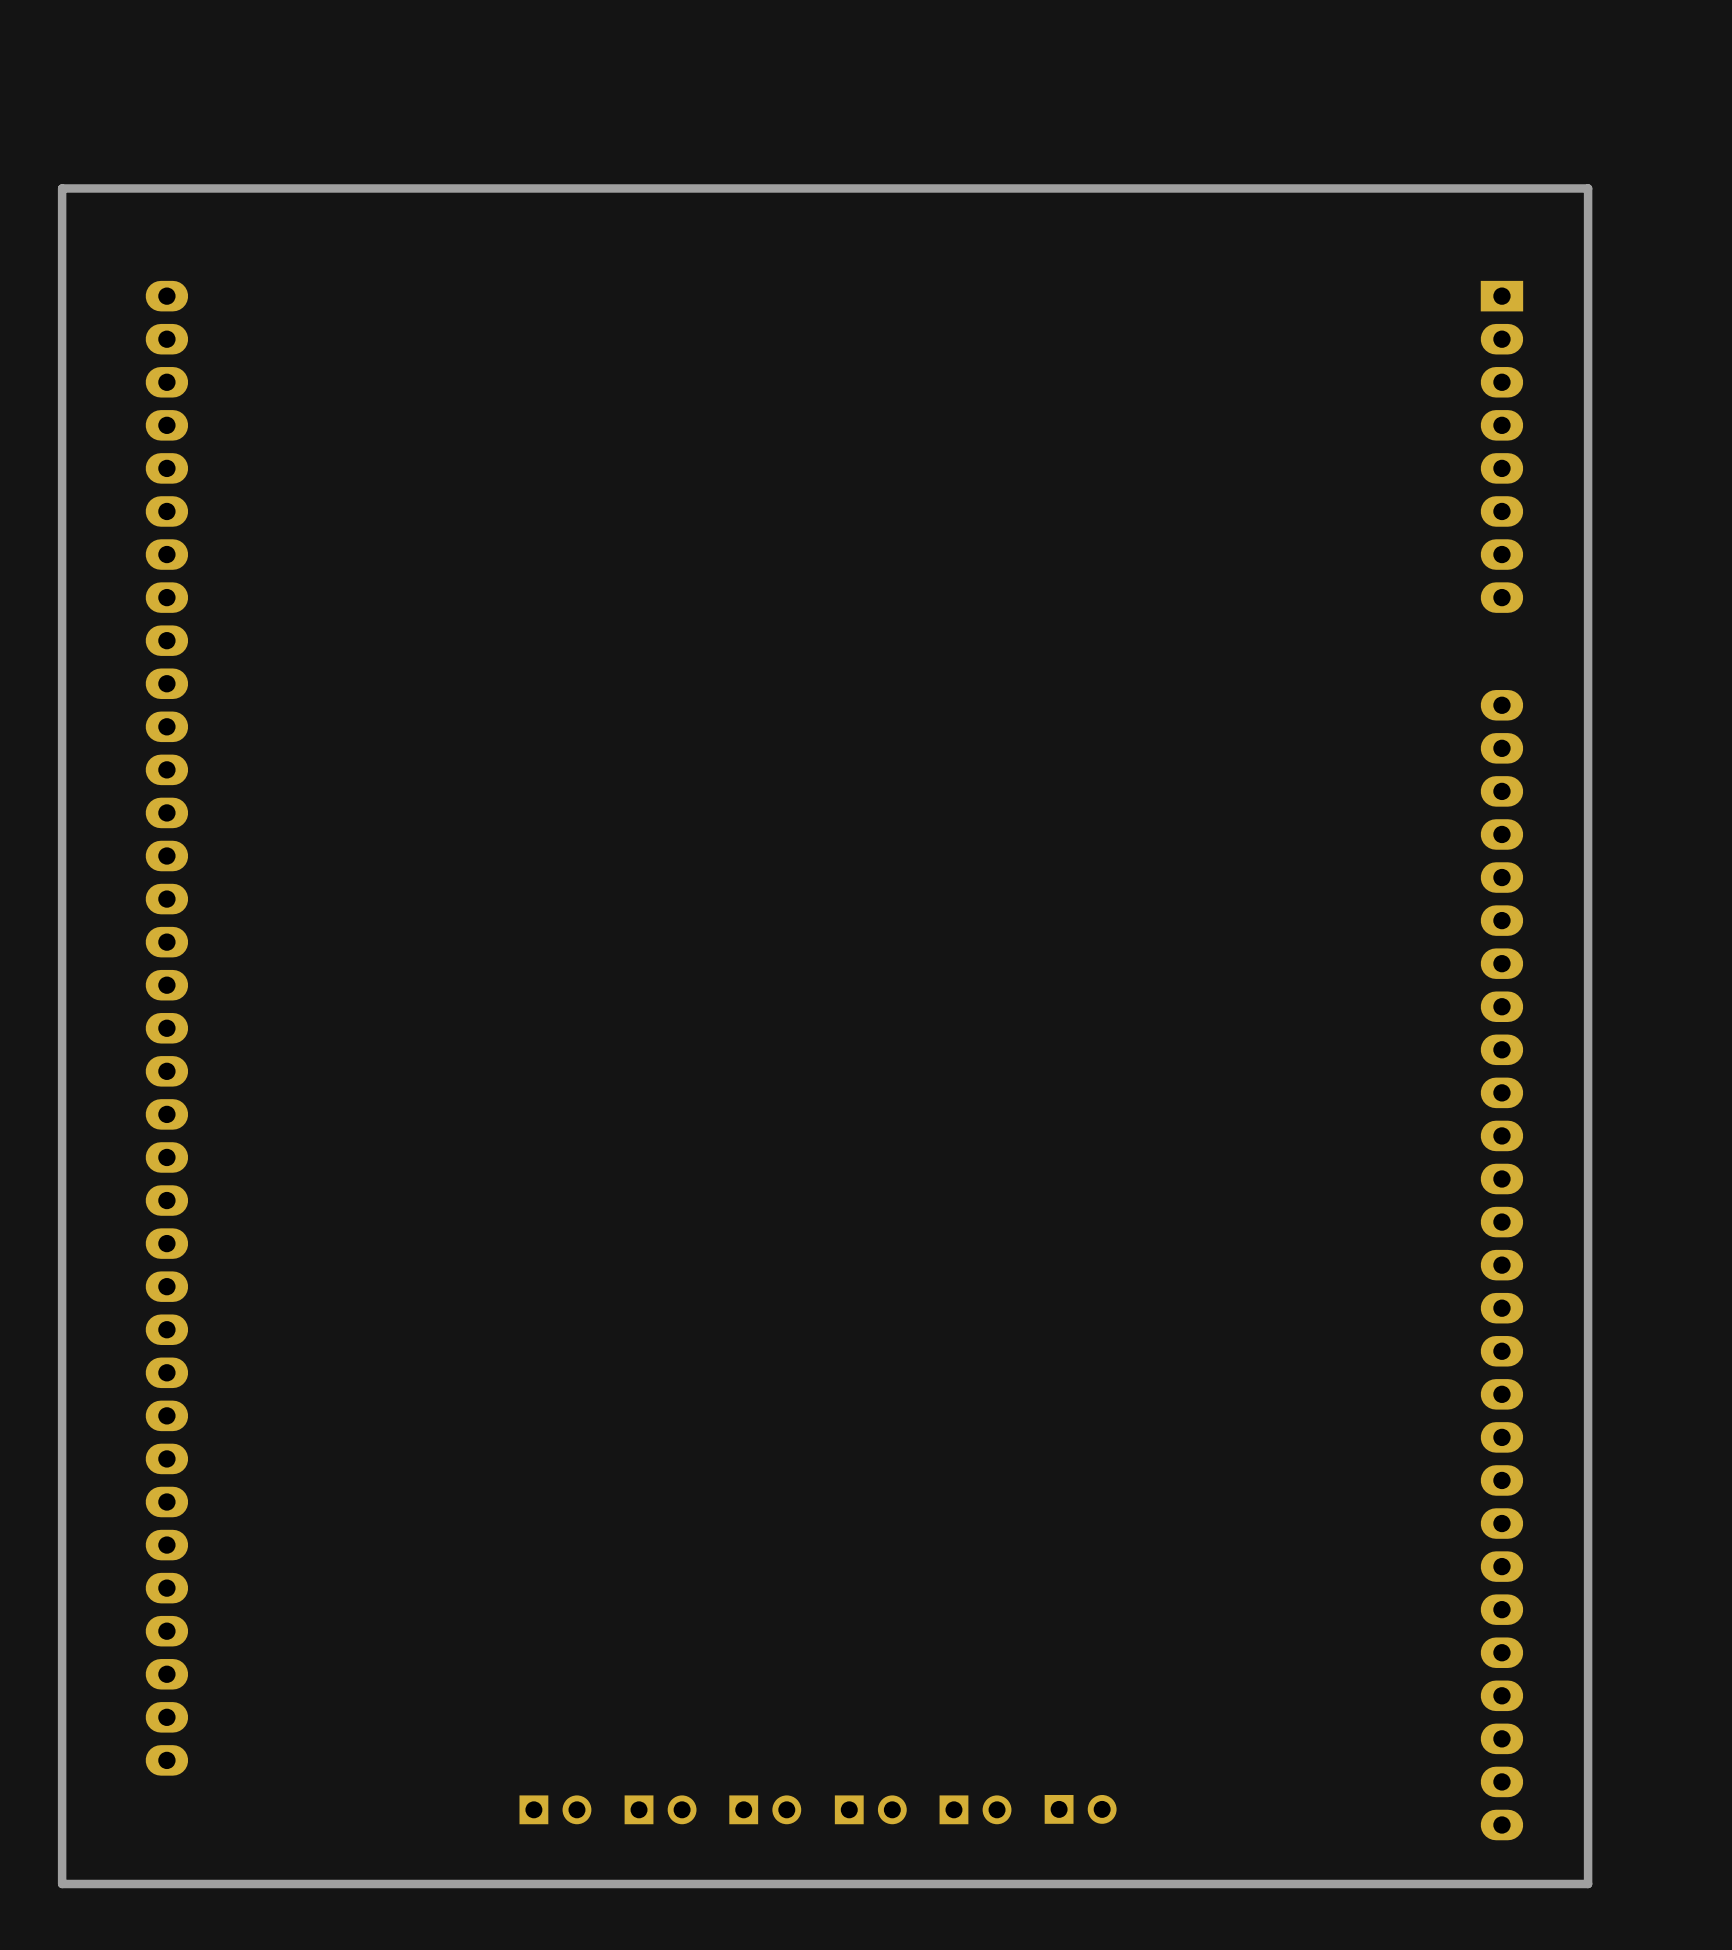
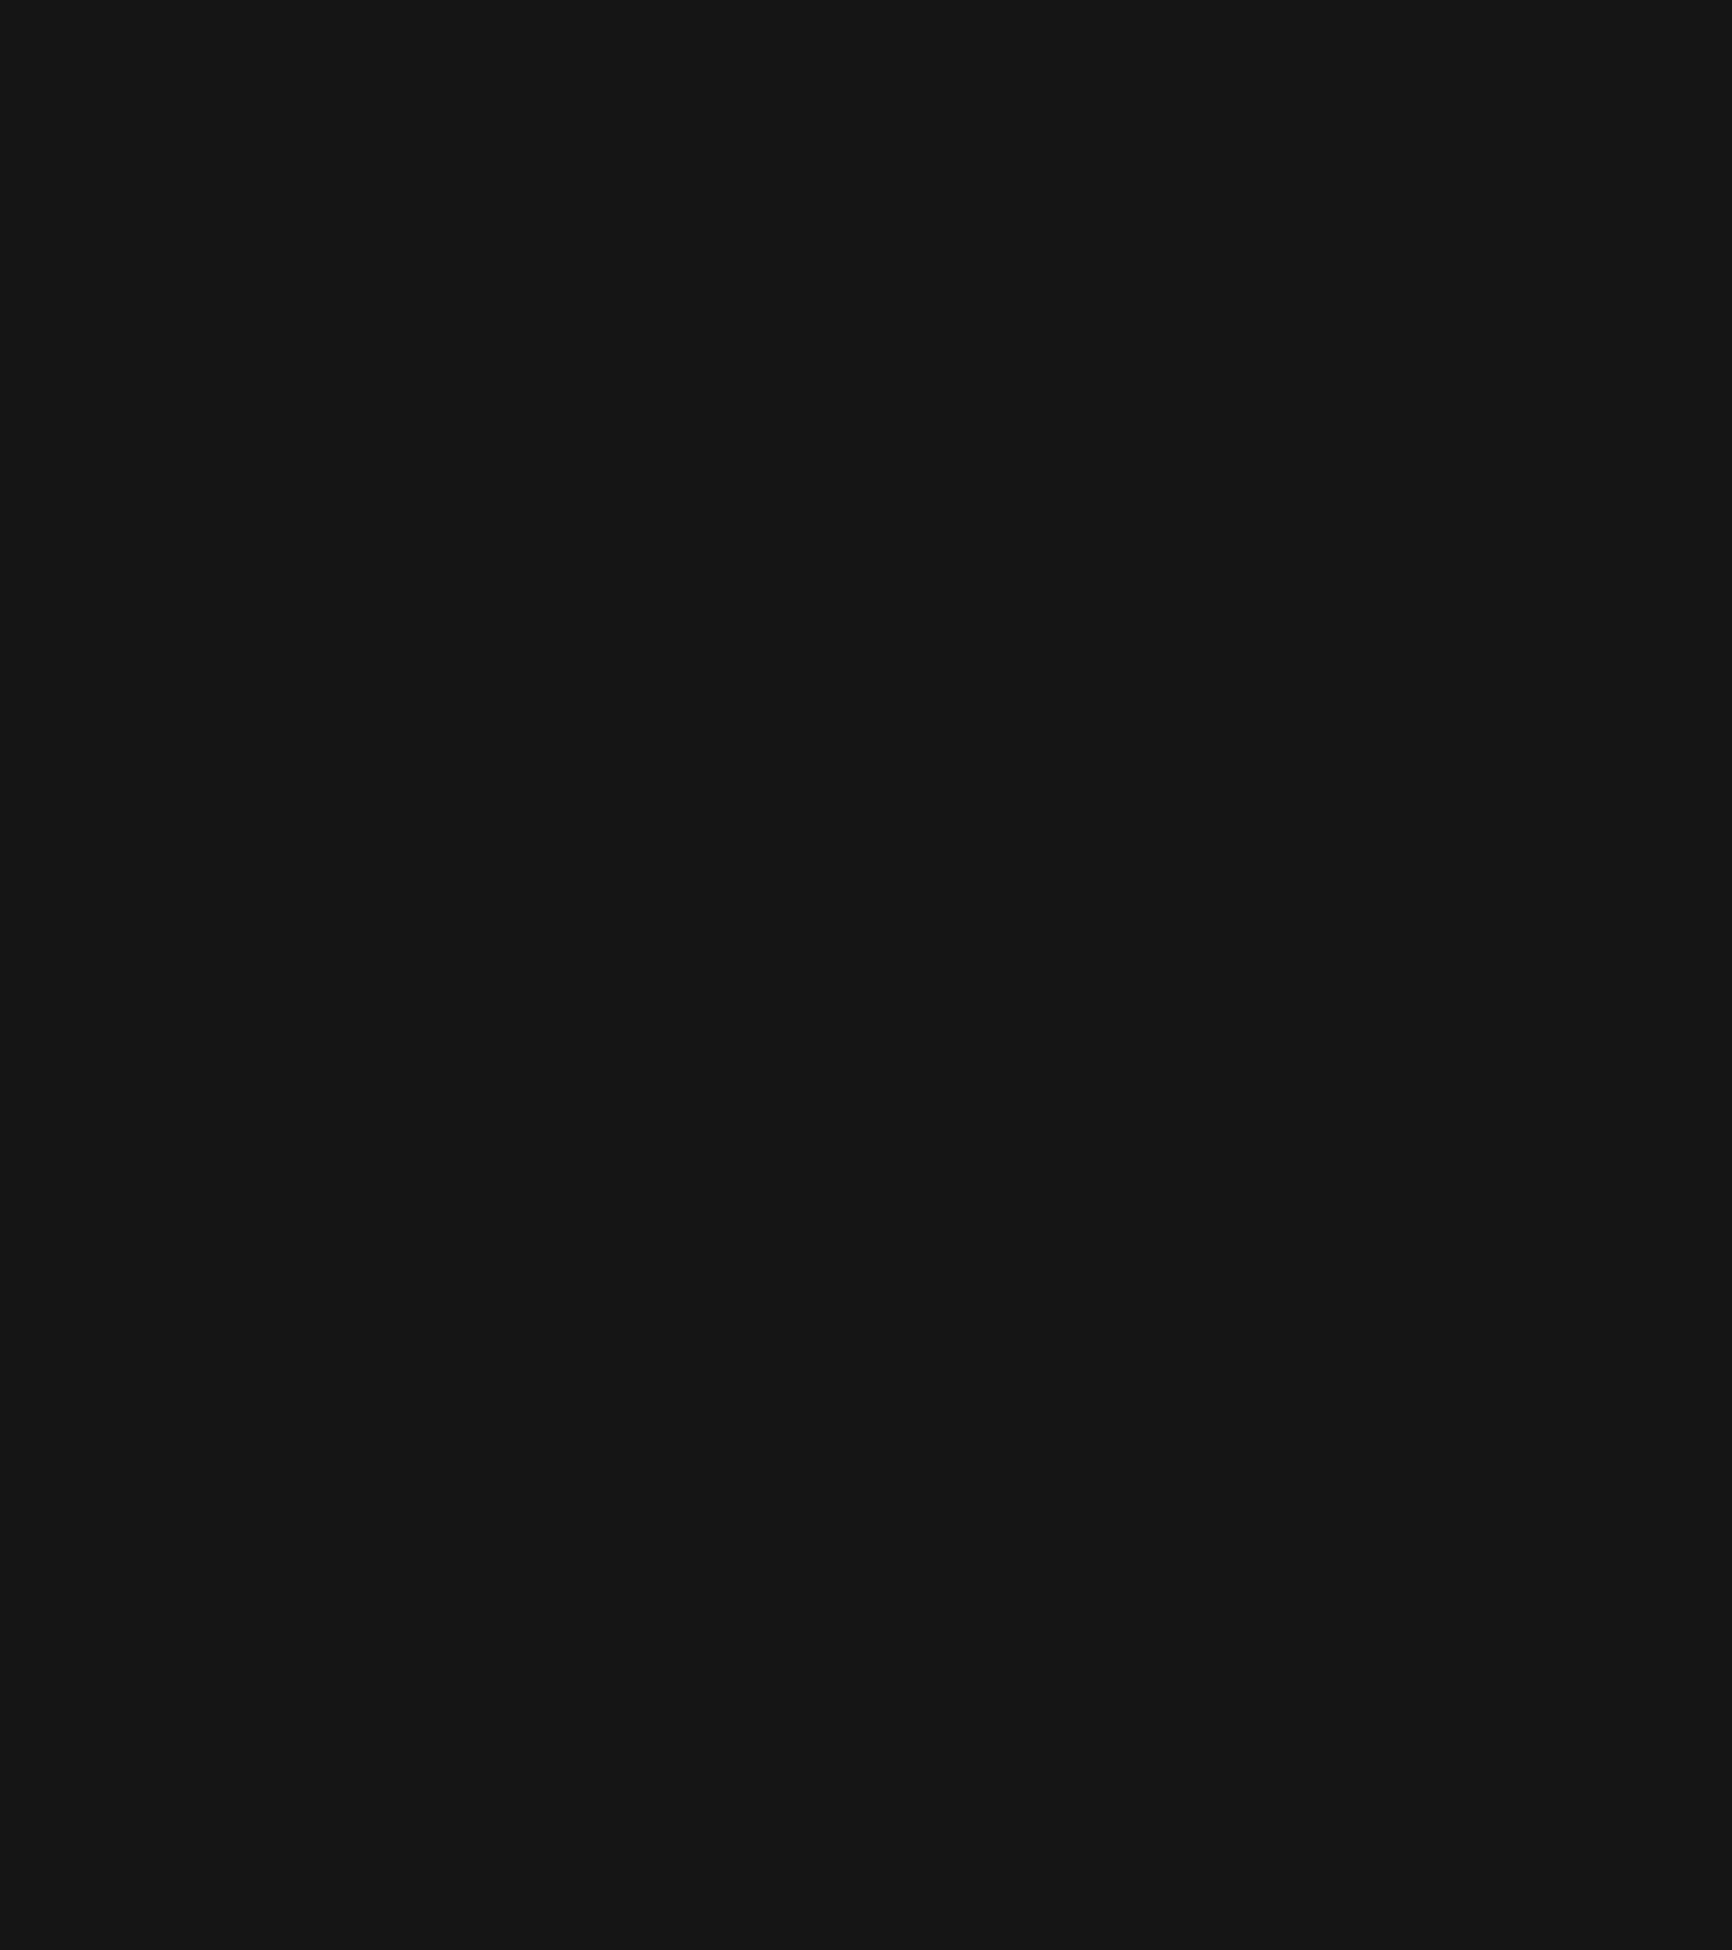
board edge: (1588, 188) (62, 188) (62, 1884) (1588, 1884) (1588, 188) -> none
part: (1501, 446) -> none
part: (166, 1028) -> none
part: (1501, 1265) -> none
part: (555, 1809) -> none
part: (660, 1809) -> none
part: (765, 1809) -> none
part: (870, 1809) -> none
part: (975, 1809) -> none
part: (1080, 1809) -> none

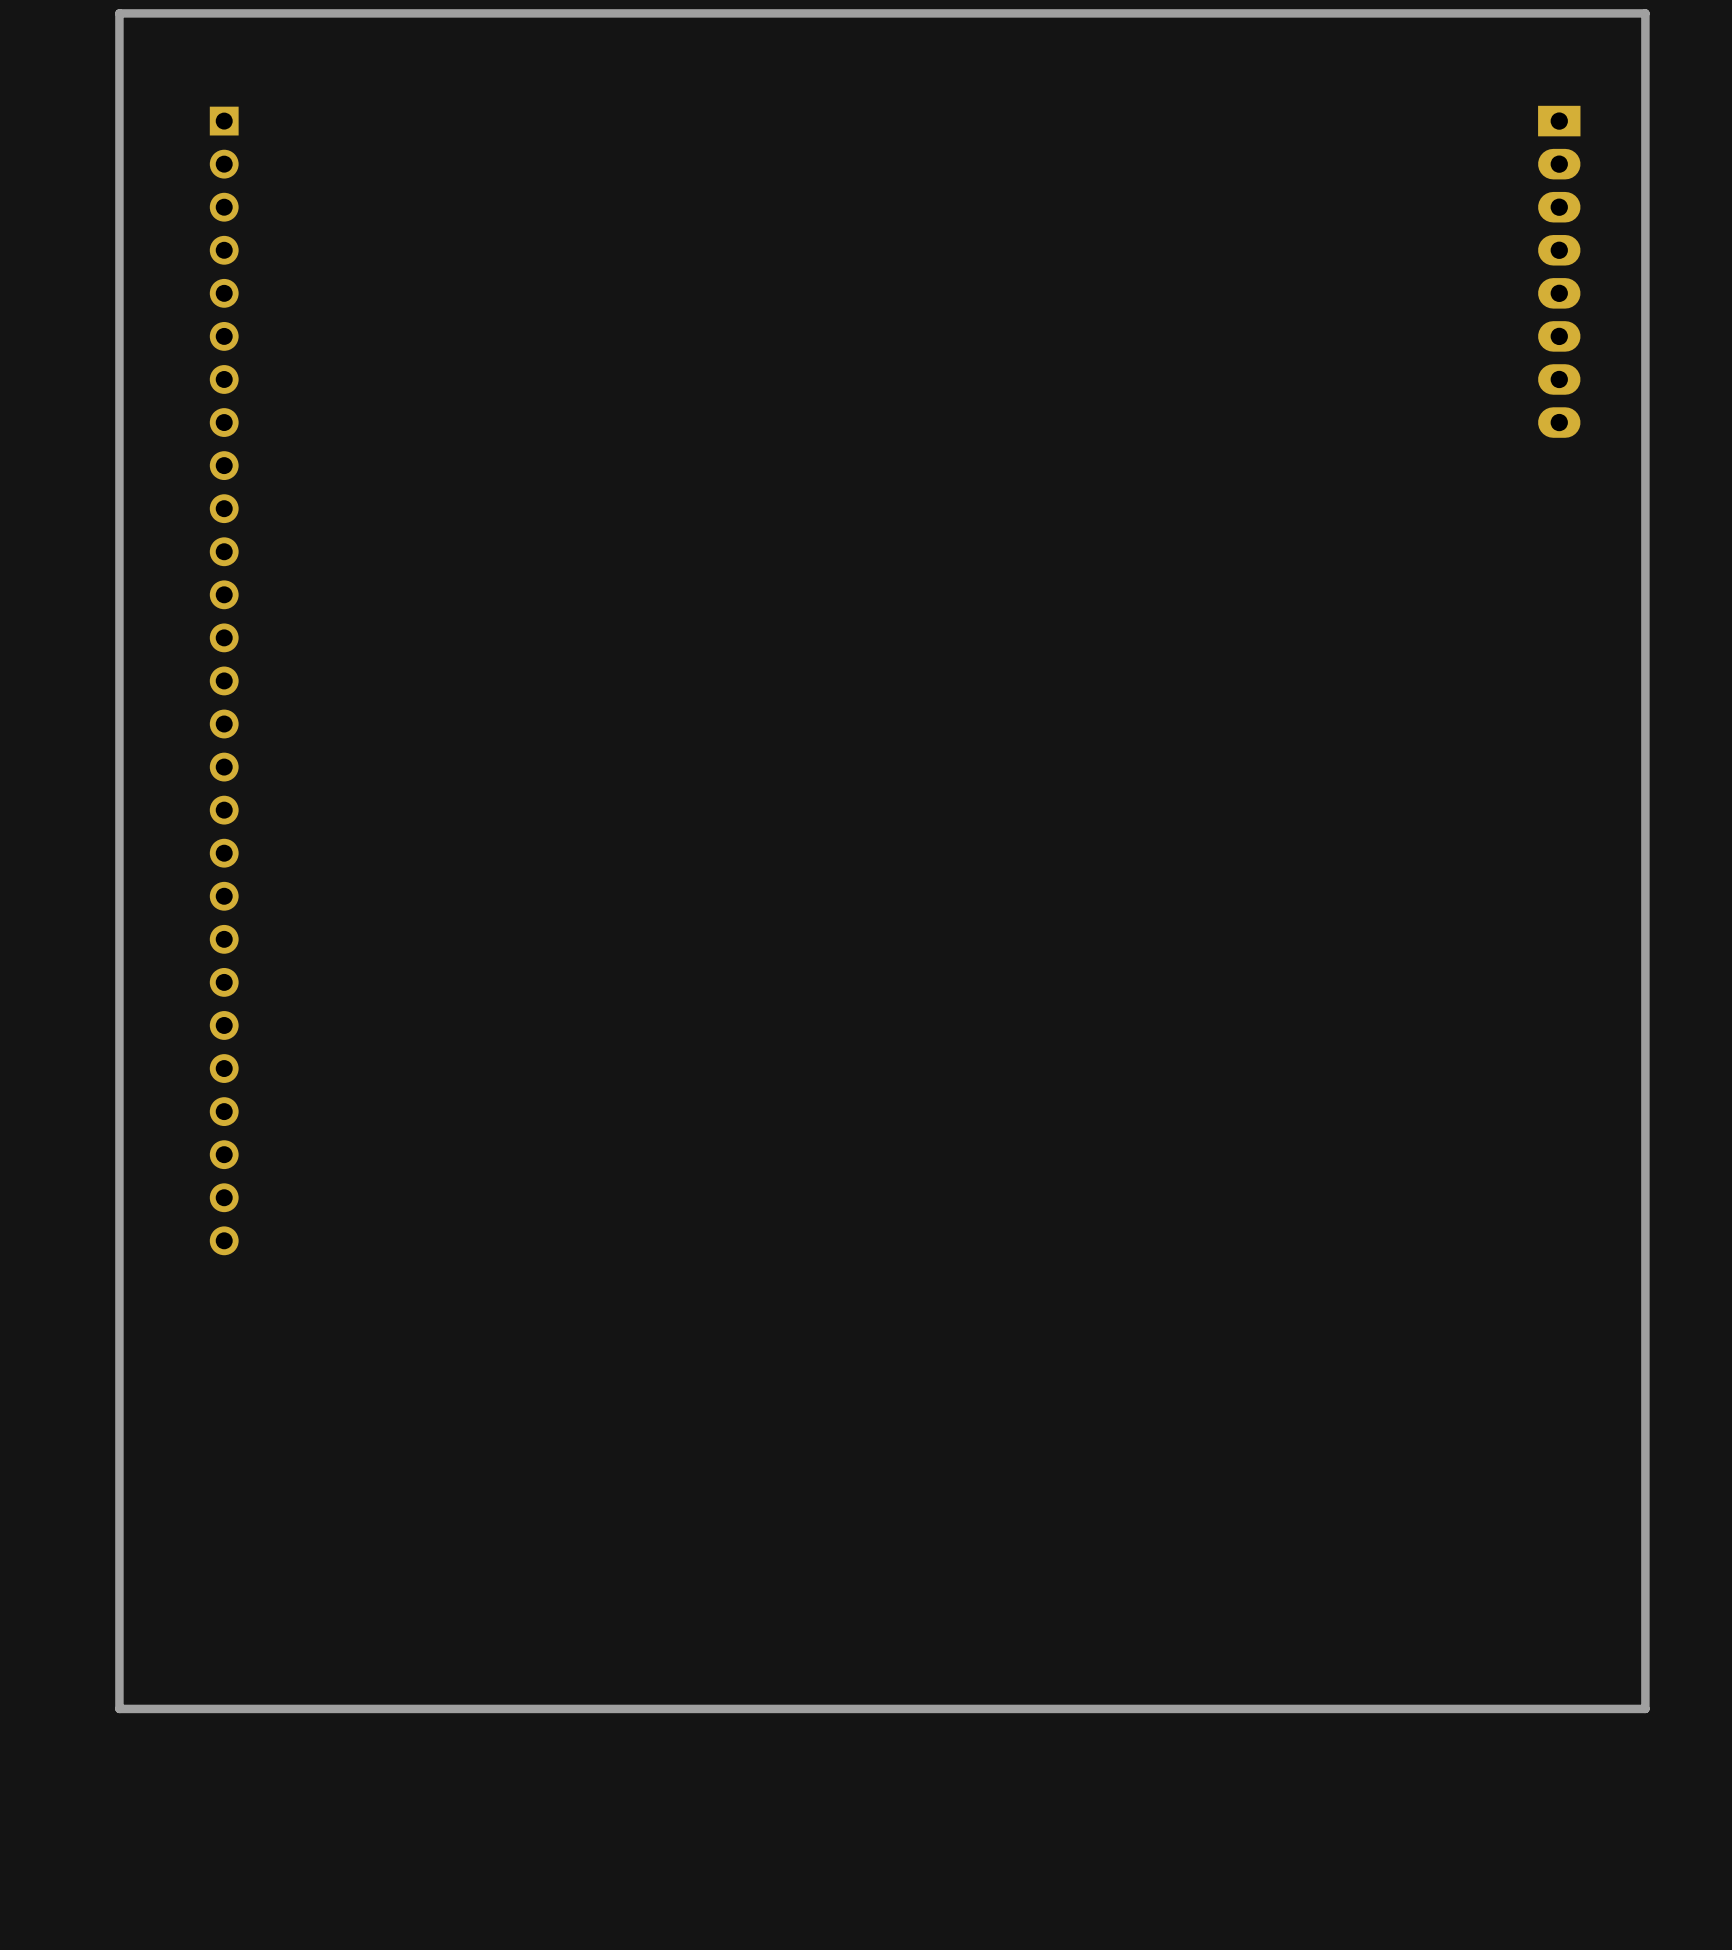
board edge: none -> (1645, 13) (1645, 1708) (119, 1708) (119, 13) (1645, 13)
part: none -> (1559, 271)
part: none -> (224, 680)

